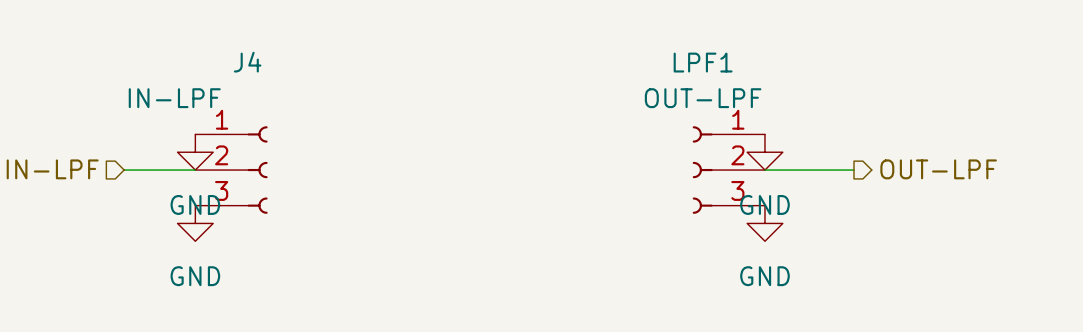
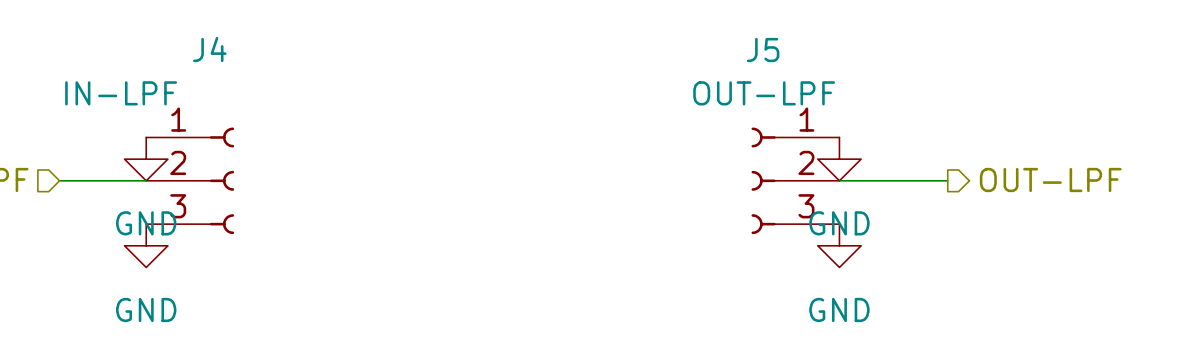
LPF1 name: LPF1 (703, 62) -> J5 (763, 50)

